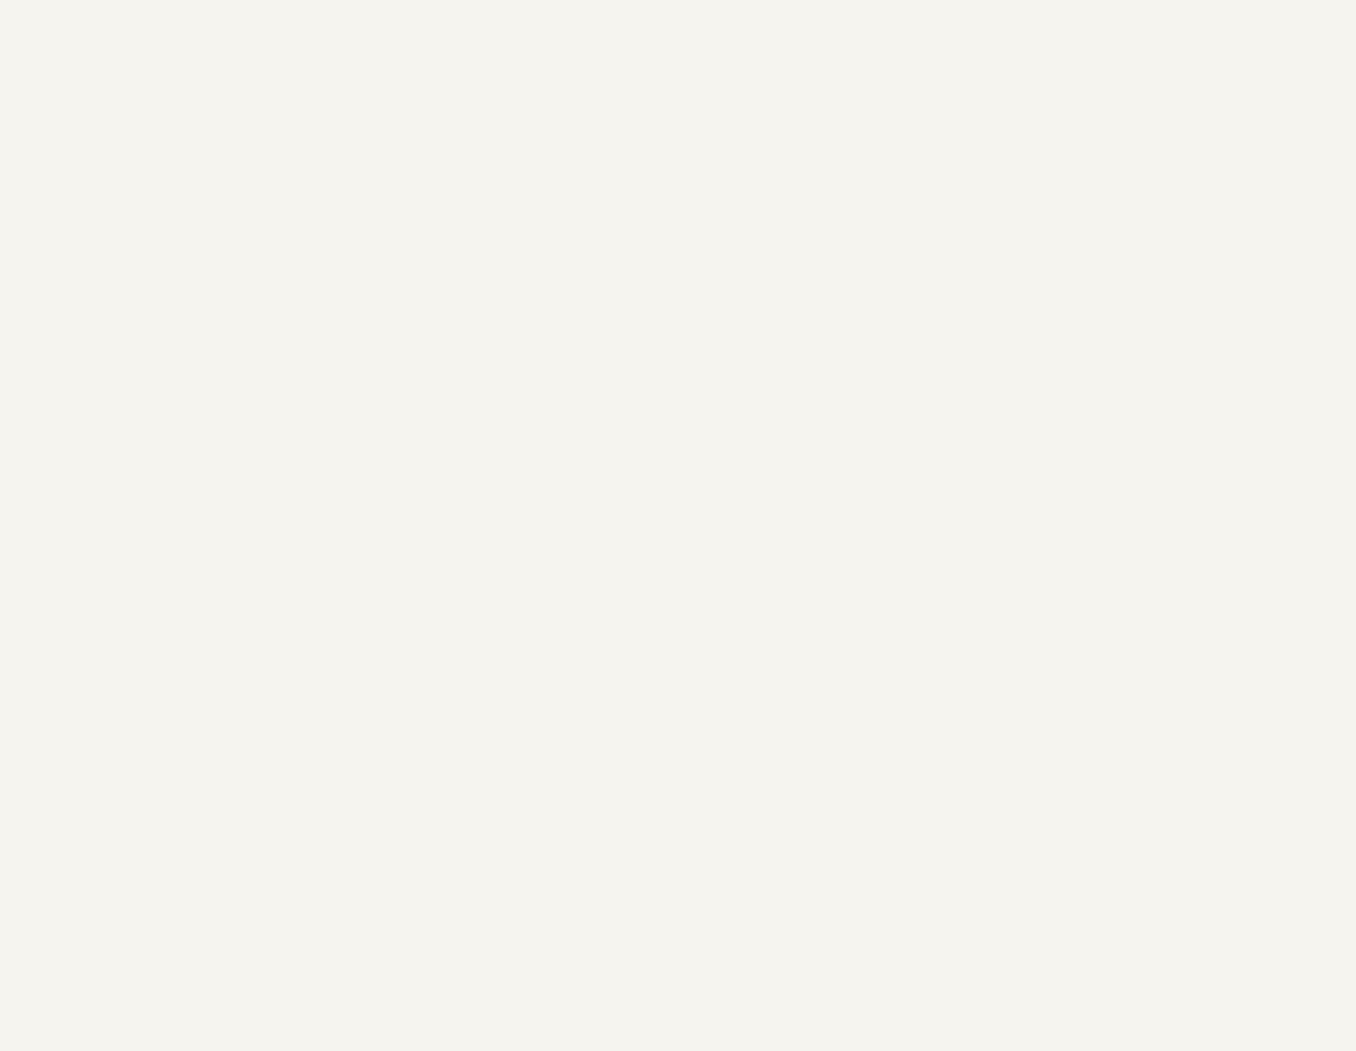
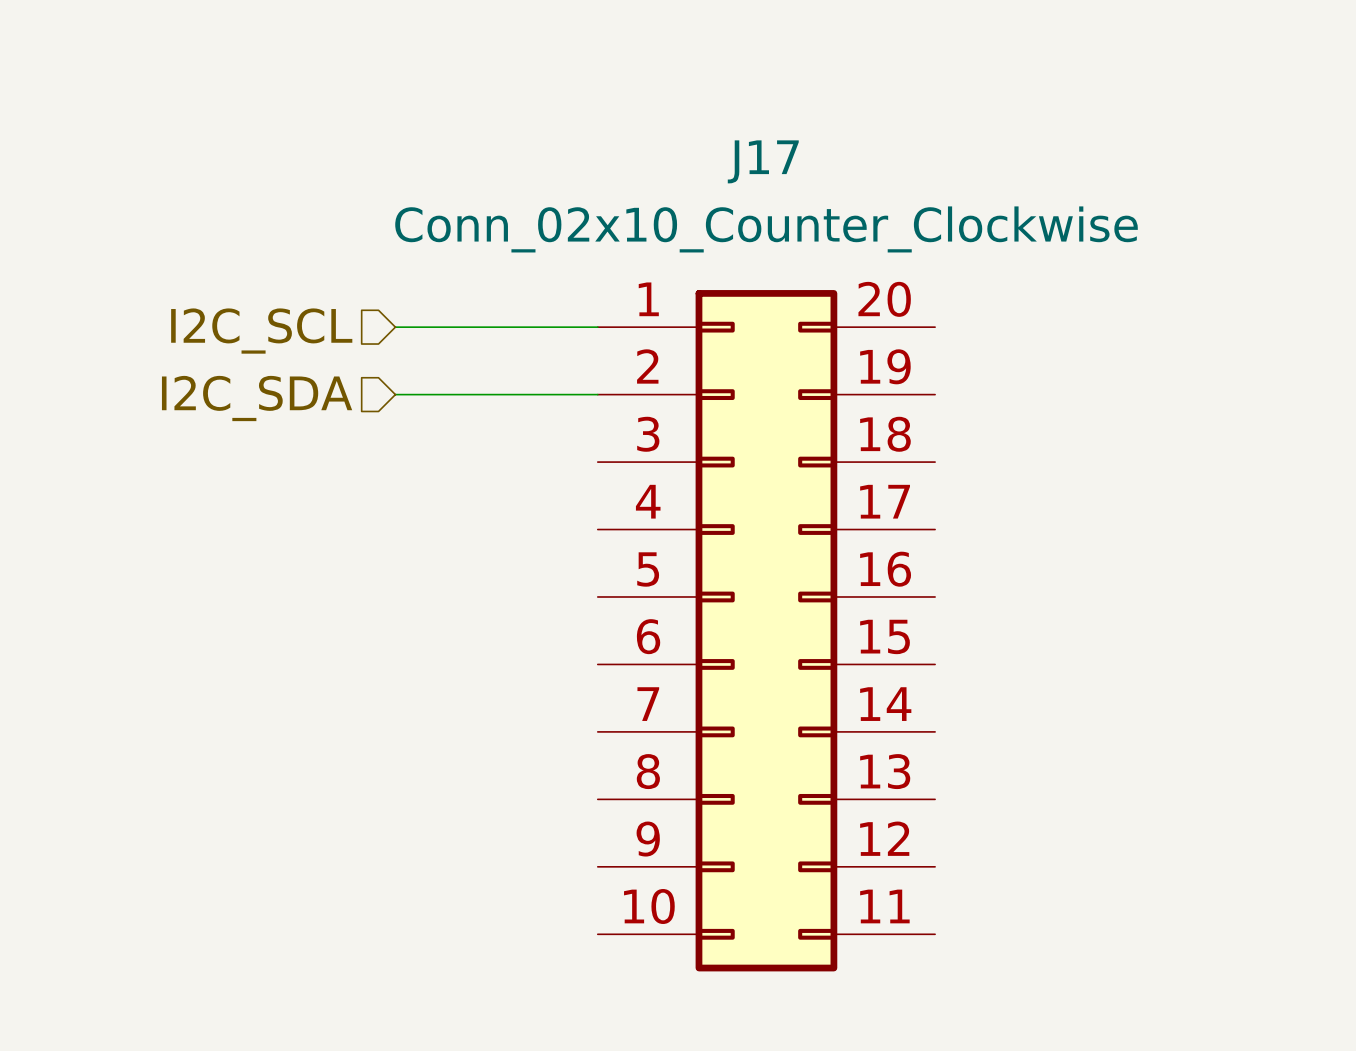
wire: none -> (395, 327) (597, 327)
hierarchical label: none -> I2C_SCL (261, 331)
wire: none -> (395, 394) (597, 394)
hierarchical label: none -> I2C_SDA (257, 398)
J17: none -> Conn_02x10_Counter_Clockwise (766, 630)

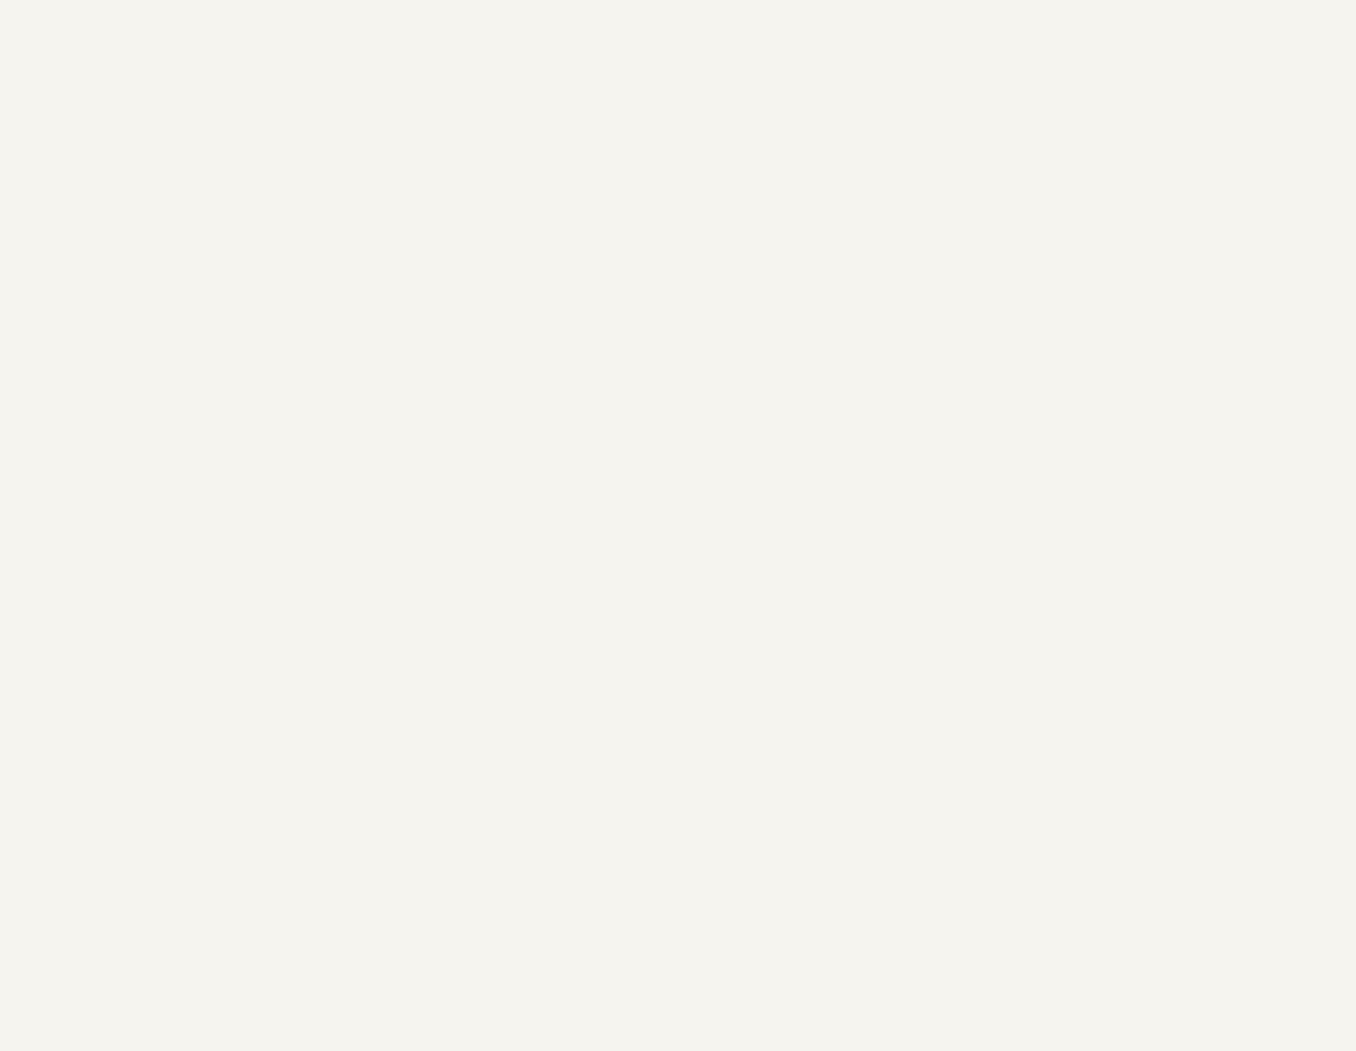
wire: (395, 327) (597, 327) -> none
hierarchical label: I2C_SCL (261, 331) -> none
wire: (395, 394) (597, 394) -> none
hierarchical label: I2C_SDA (257, 398) -> none
J17: Conn_02x10_Counter_Clockwise (766, 630) -> none

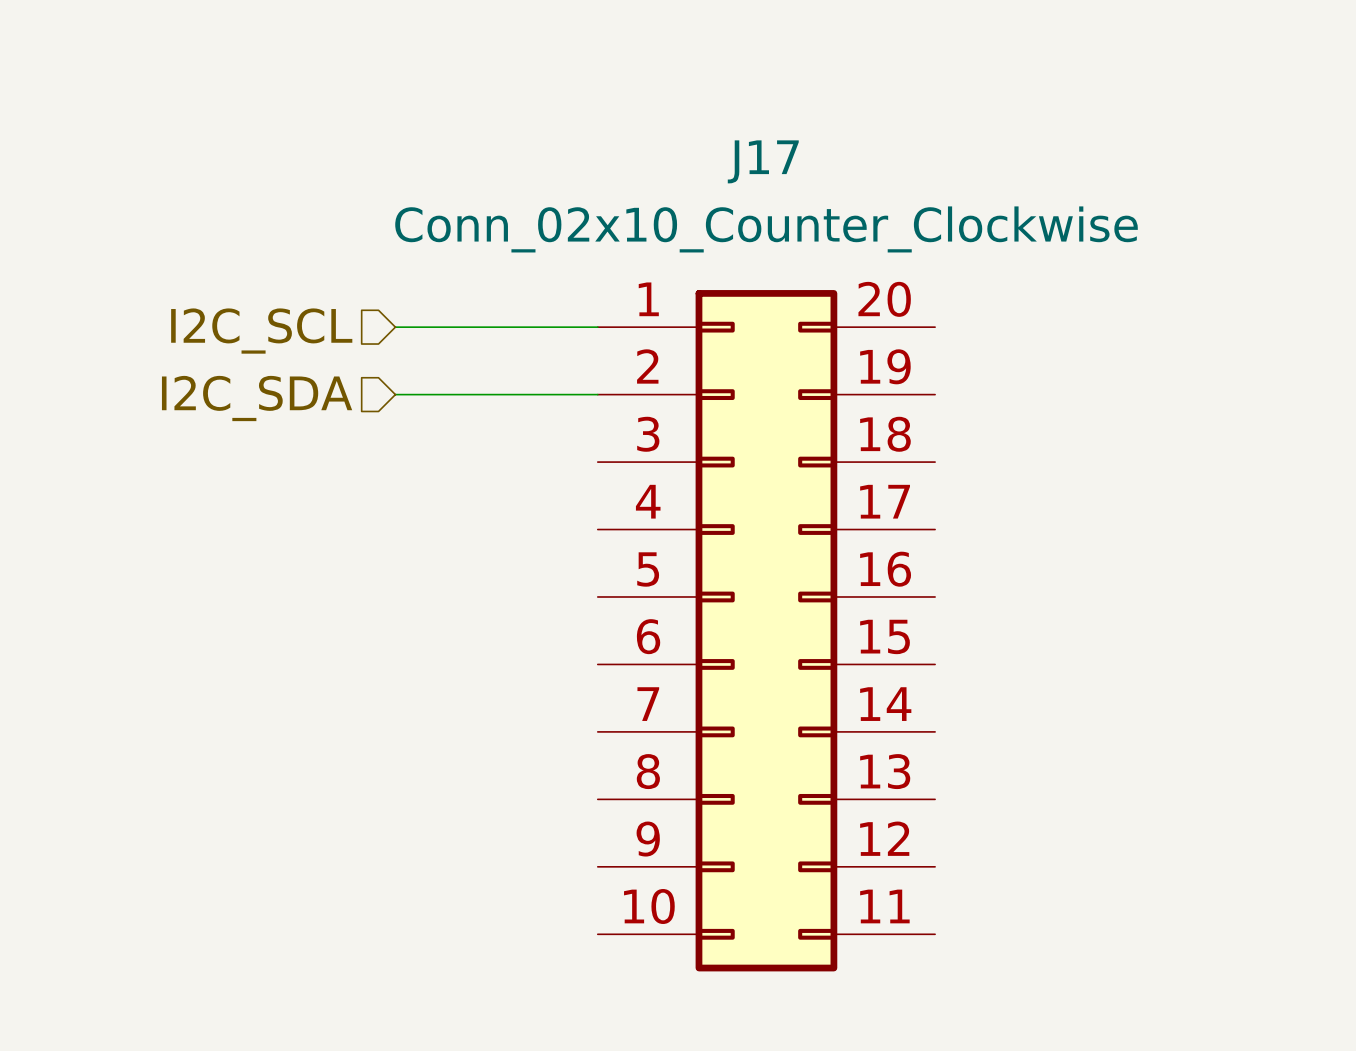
wire: none -> (395, 327) (597, 327)
hierarchical label: none -> I2C_SCL (261, 331)
wire: none -> (395, 394) (597, 394)
hierarchical label: none -> I2C_SDA (257, 398)
J17: none -> Conn_02x10_Counter_Clockwise (766, 630)

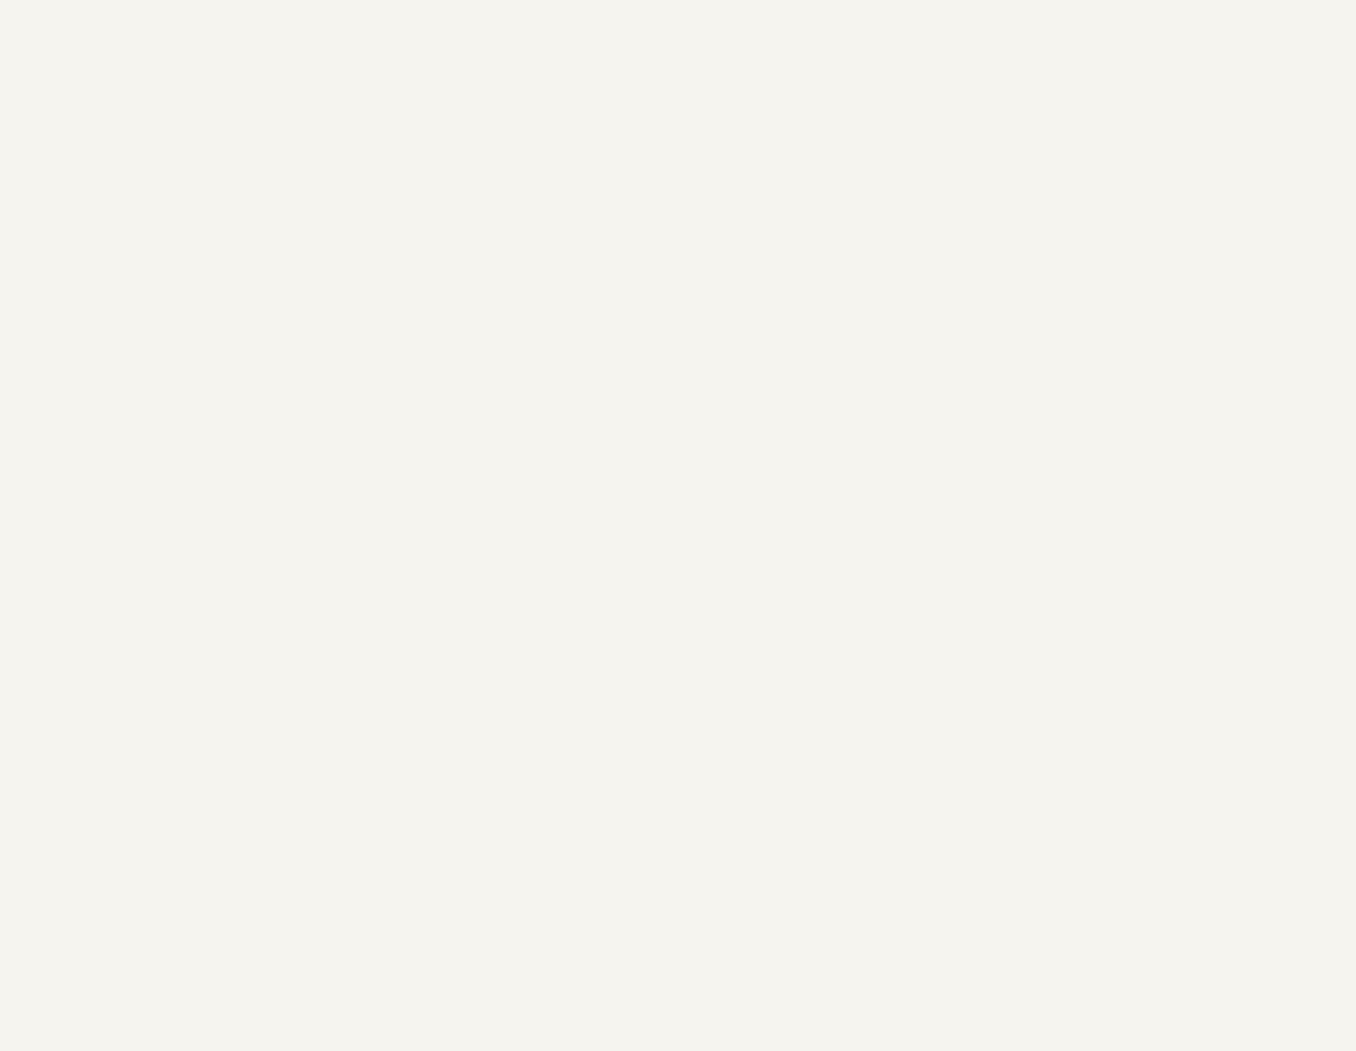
wire: (395, 327) (597, 327) -> none
hierarchical label: I2C_SCL (261, 331) -> none
wire: (395, 394) (597, 394) -> none
hierarchical label: I2C_SDA (257, 398) -> none
J17: Conn_02x10_Counter_Clockwise (766, 630) -> none

